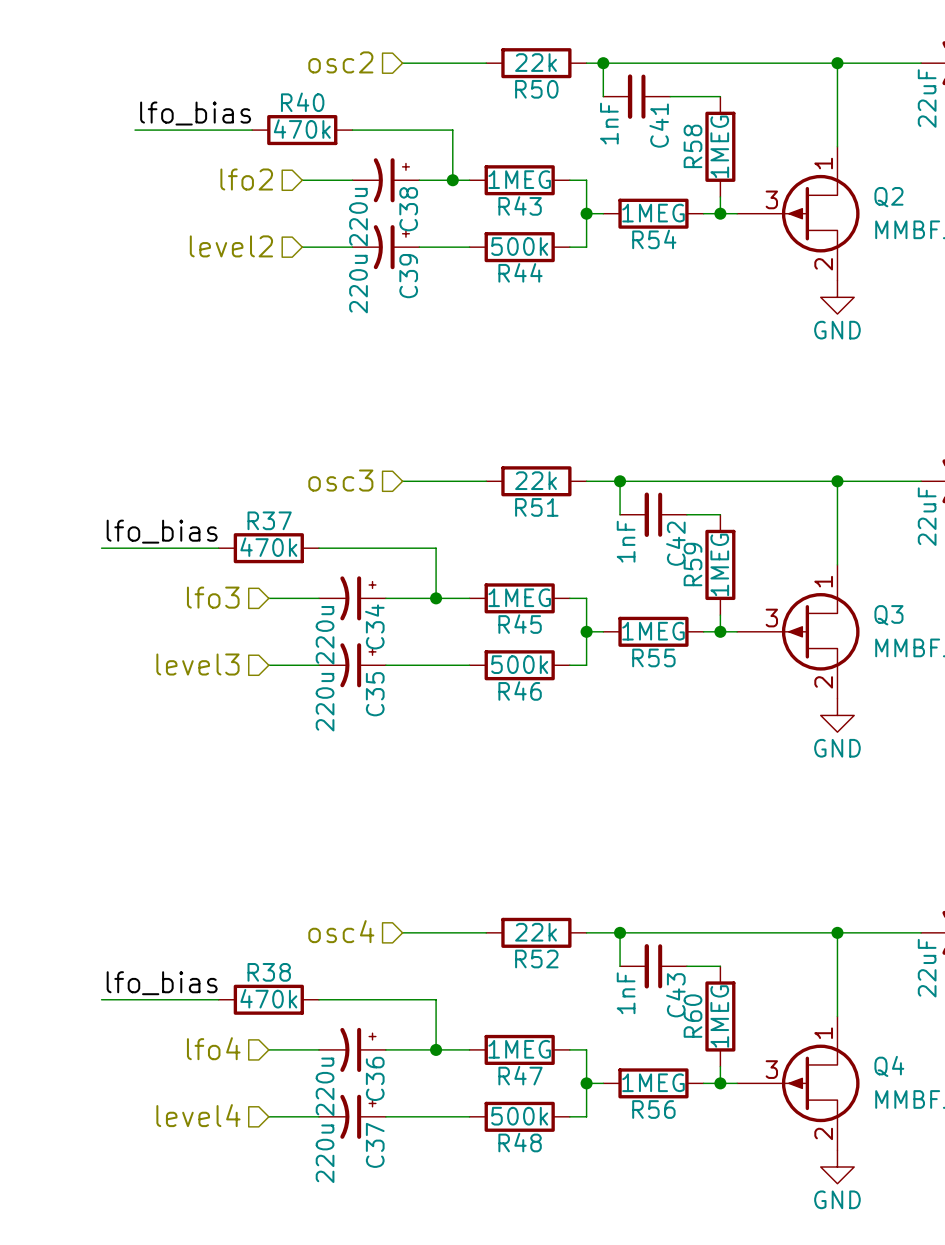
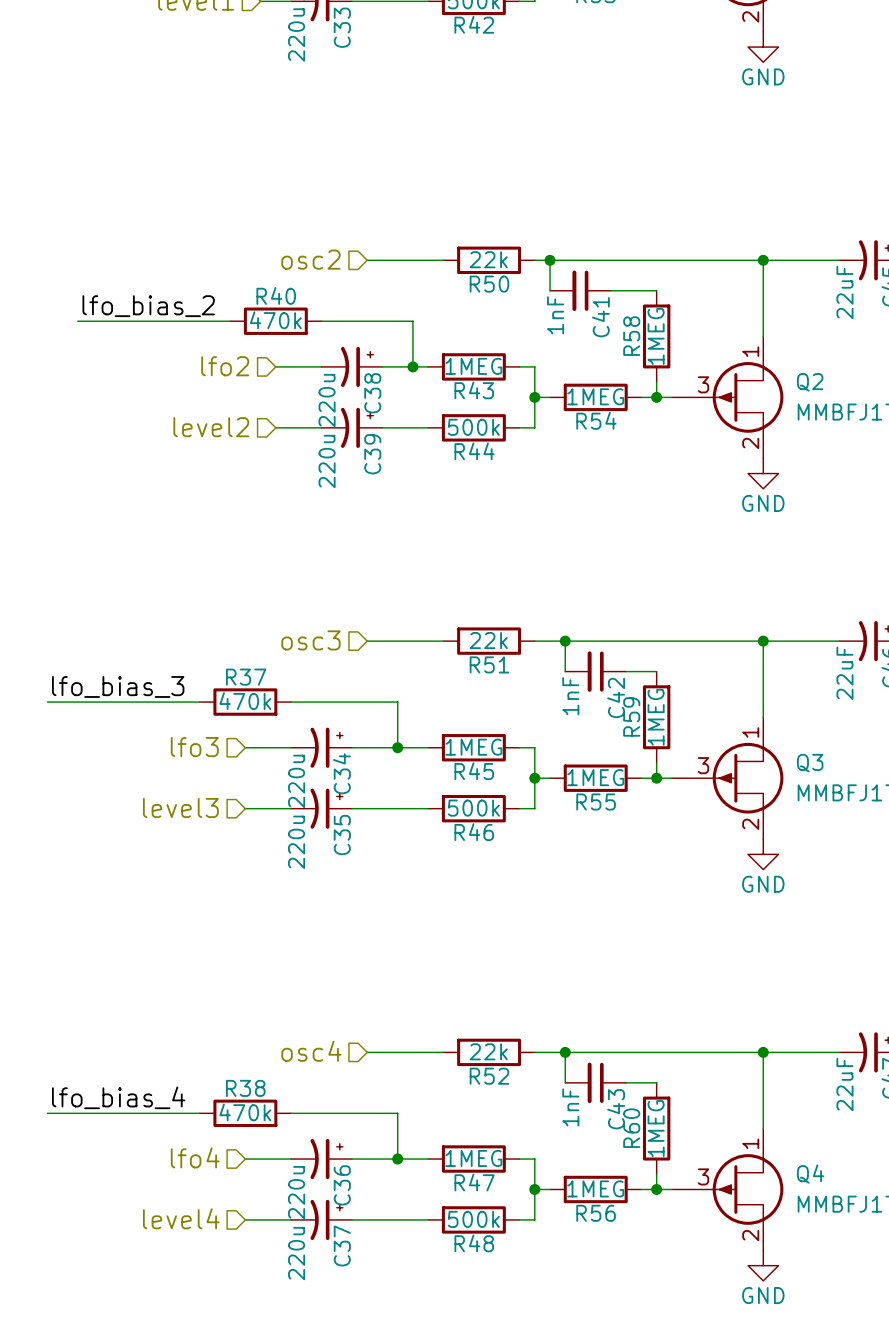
label: lfo_bias (195, 113) -> lfo_bias_2 (148, 306)
wire: none -> (77, 321) (123, 321)
label: lfo_bias (162, 531) -> lfo_bias_3 (118, 686)
wire: none -> (47, 702) (93, 702)
label: lfo_bias (162, 983) -> lfo_bias_4 (118, 1097)
wire: none -> (47, 1113) (93, 1113)

